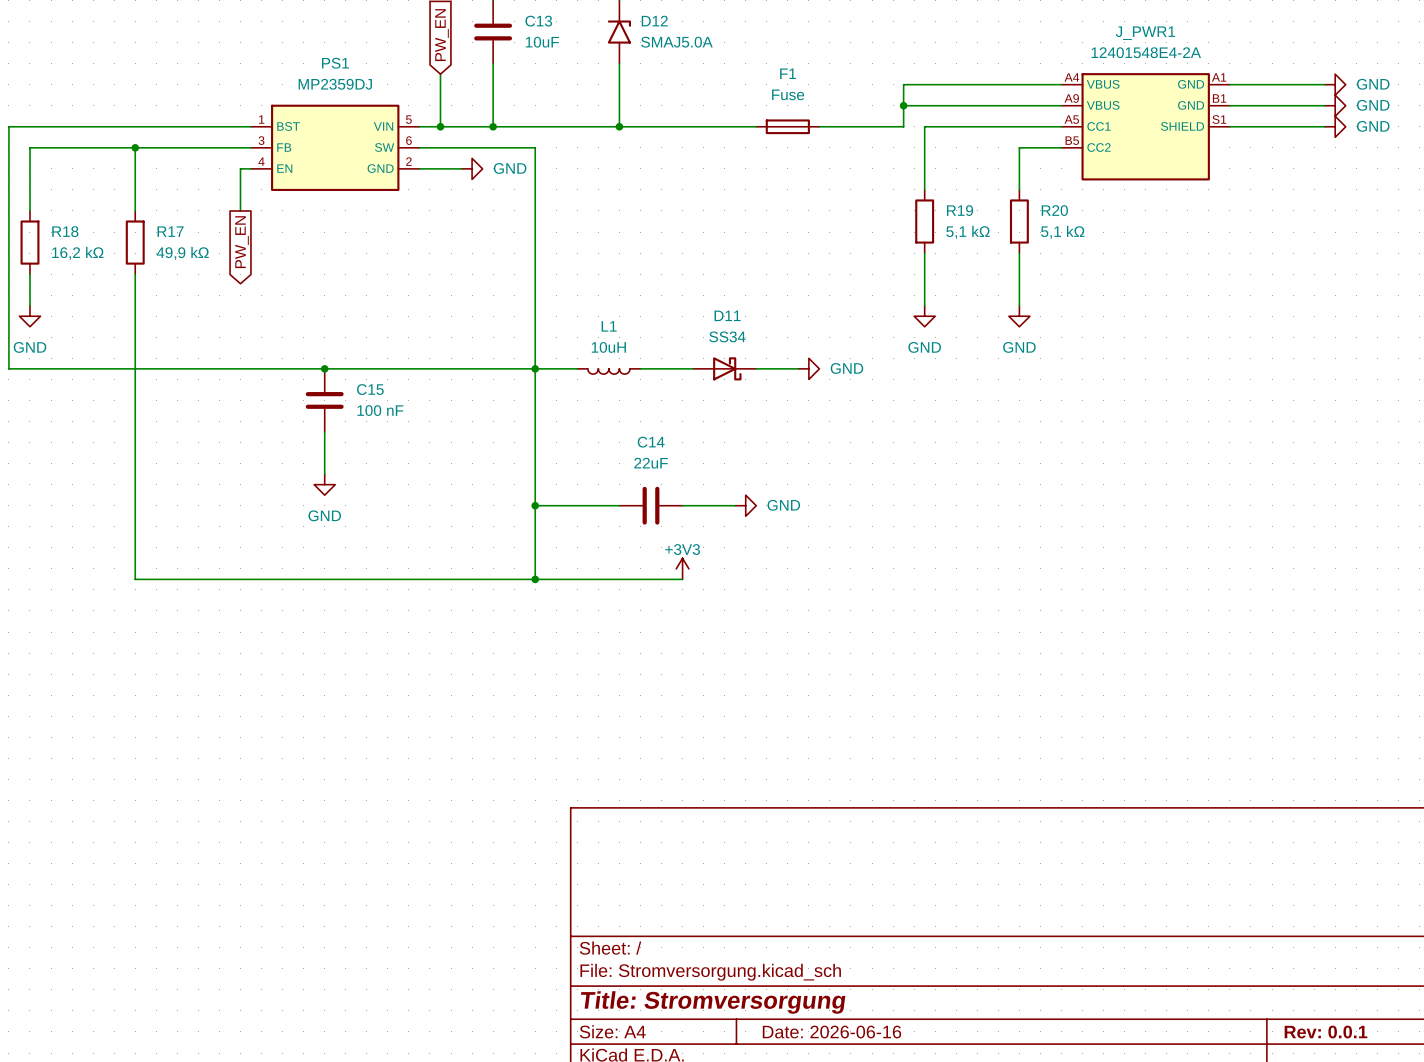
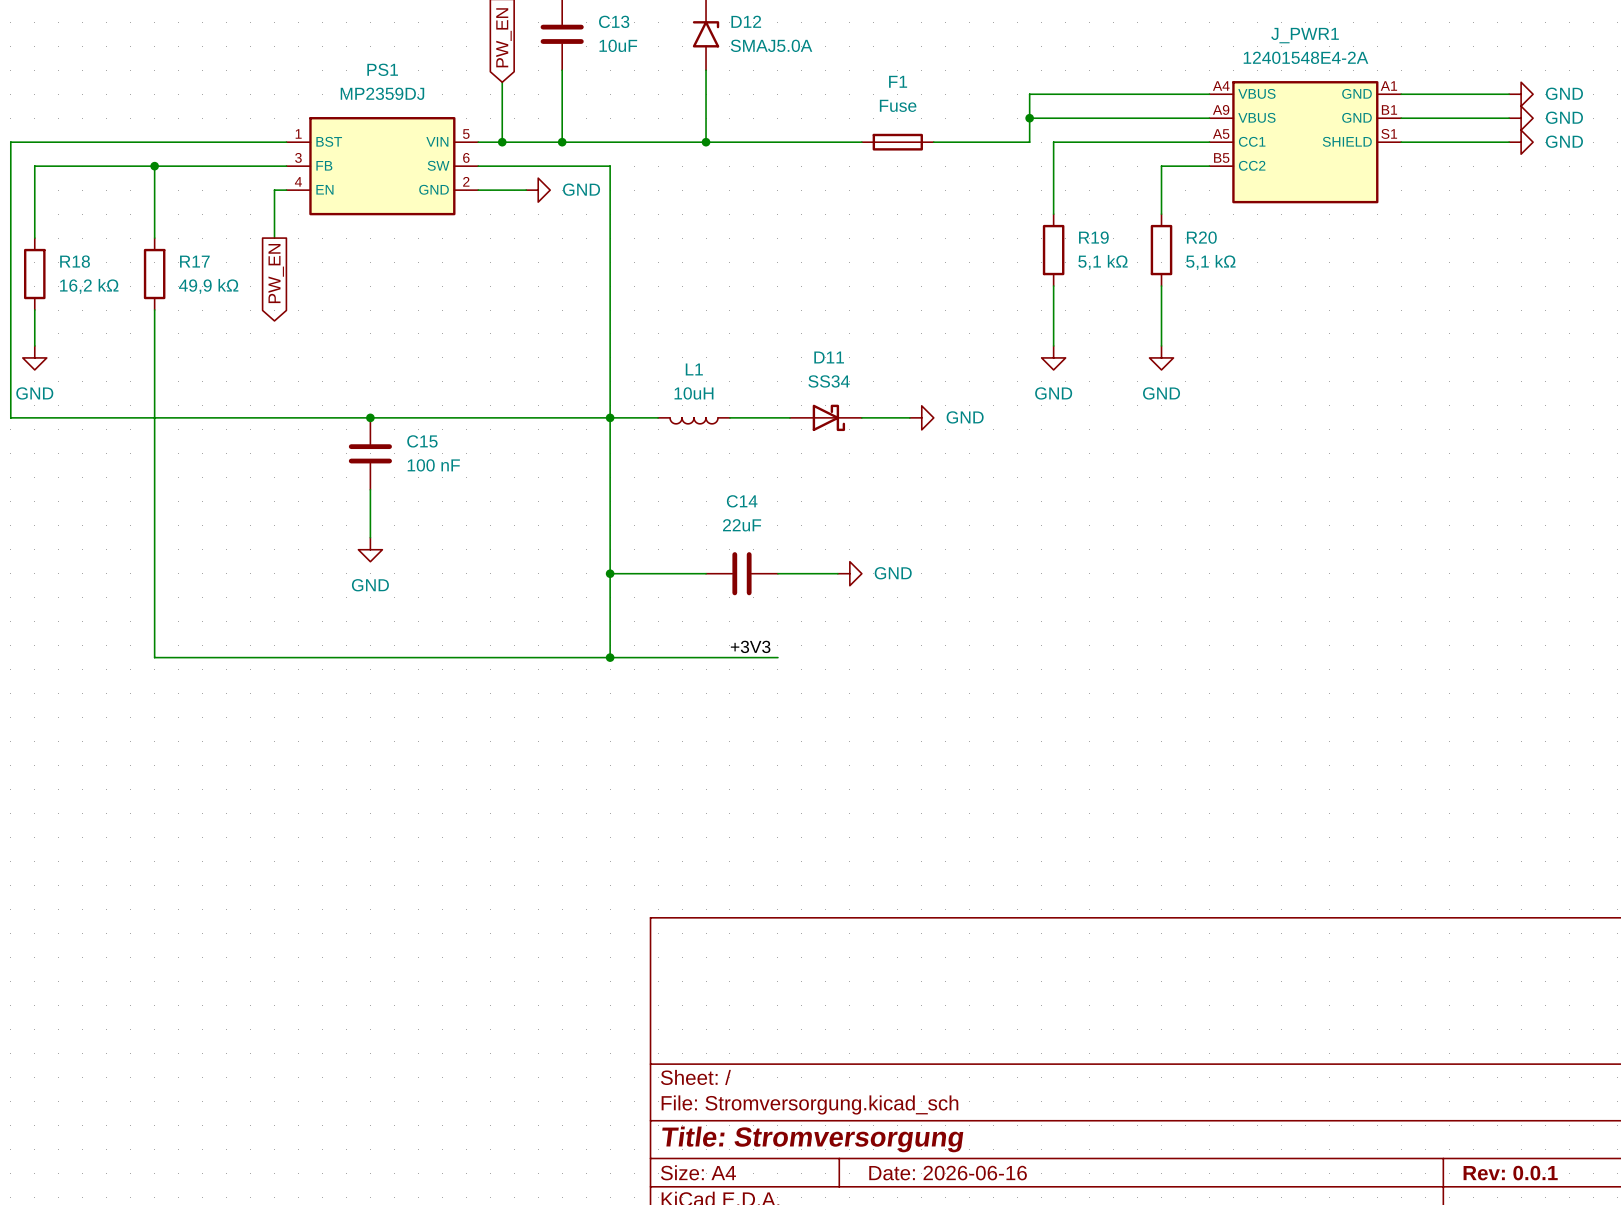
power symbol: +3V3 (682, 568) -> none
label: none -> +3V3 (750, 646)

